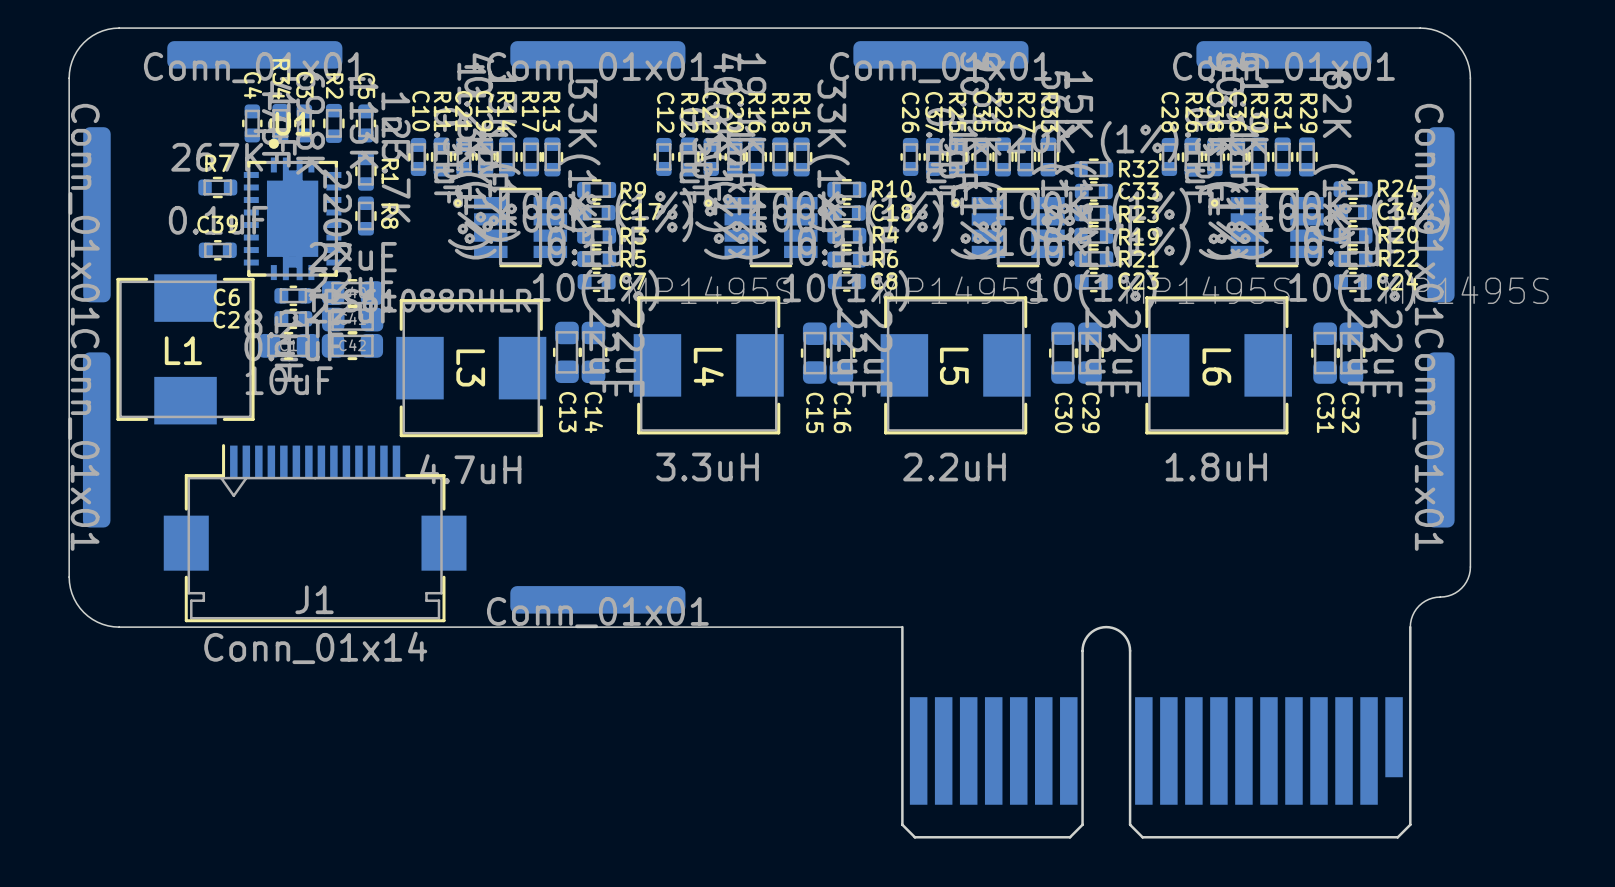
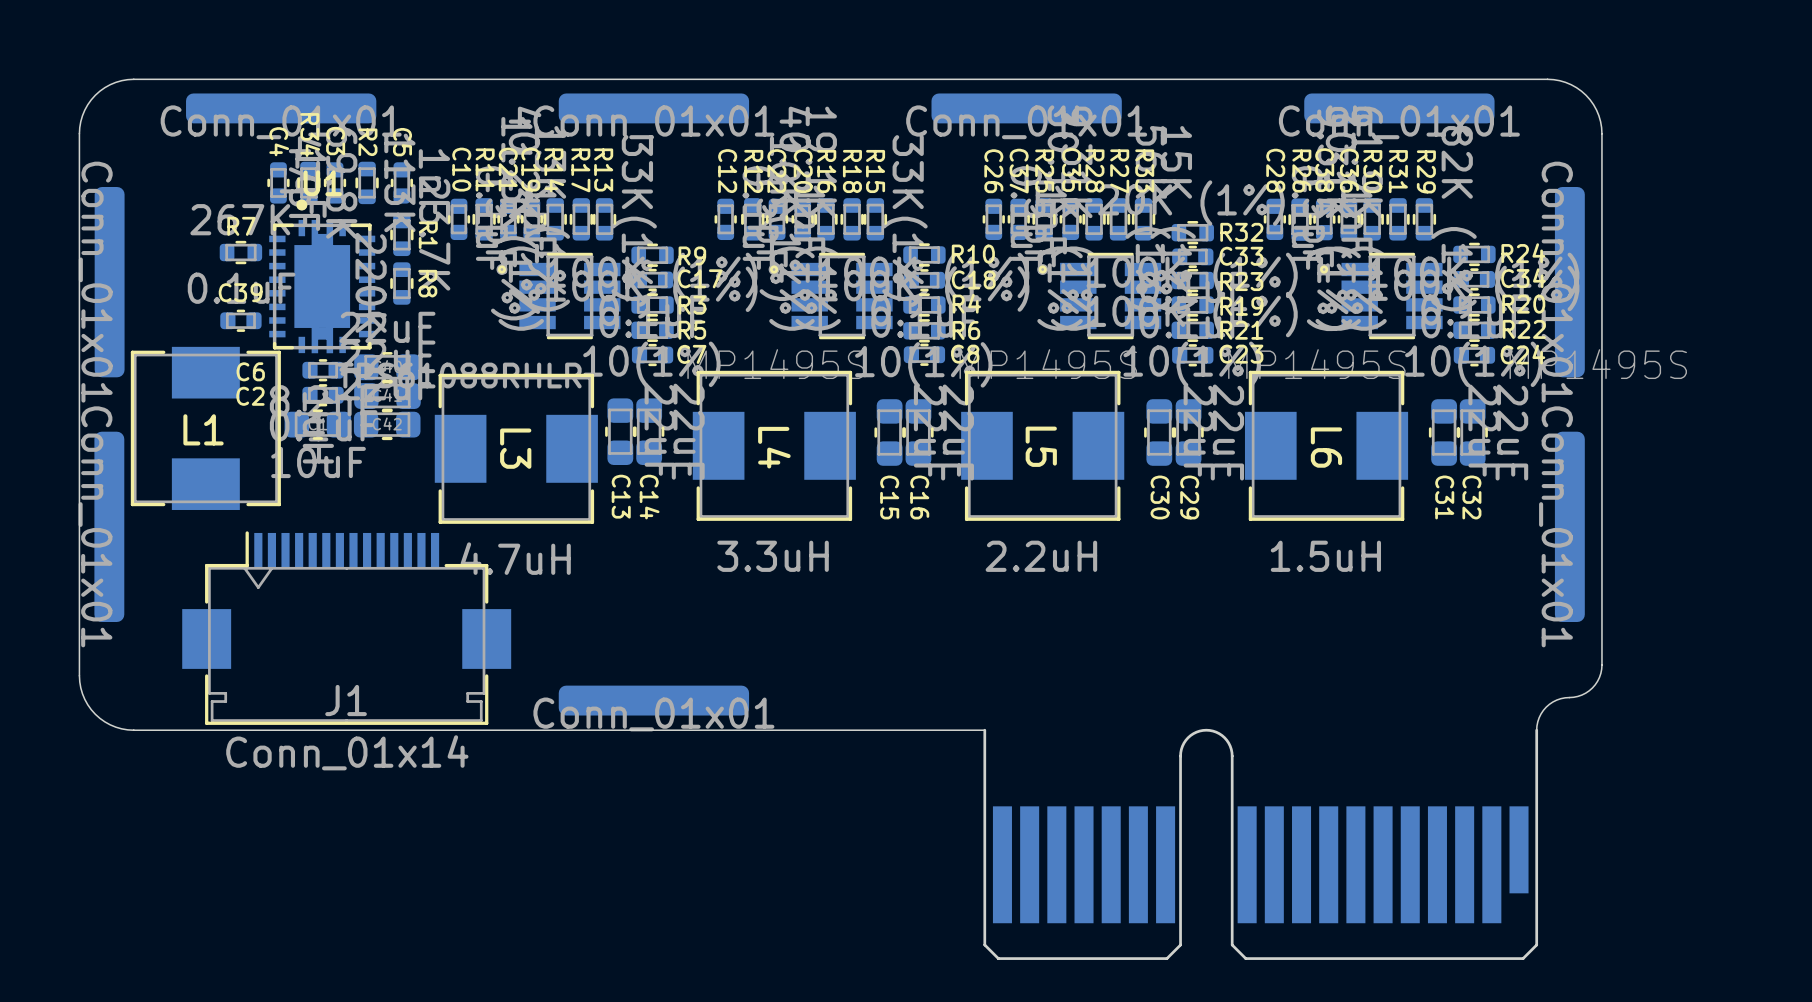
L6 value: 1.8uH (1216, 467) -> 1.5uH (1325, 556)

